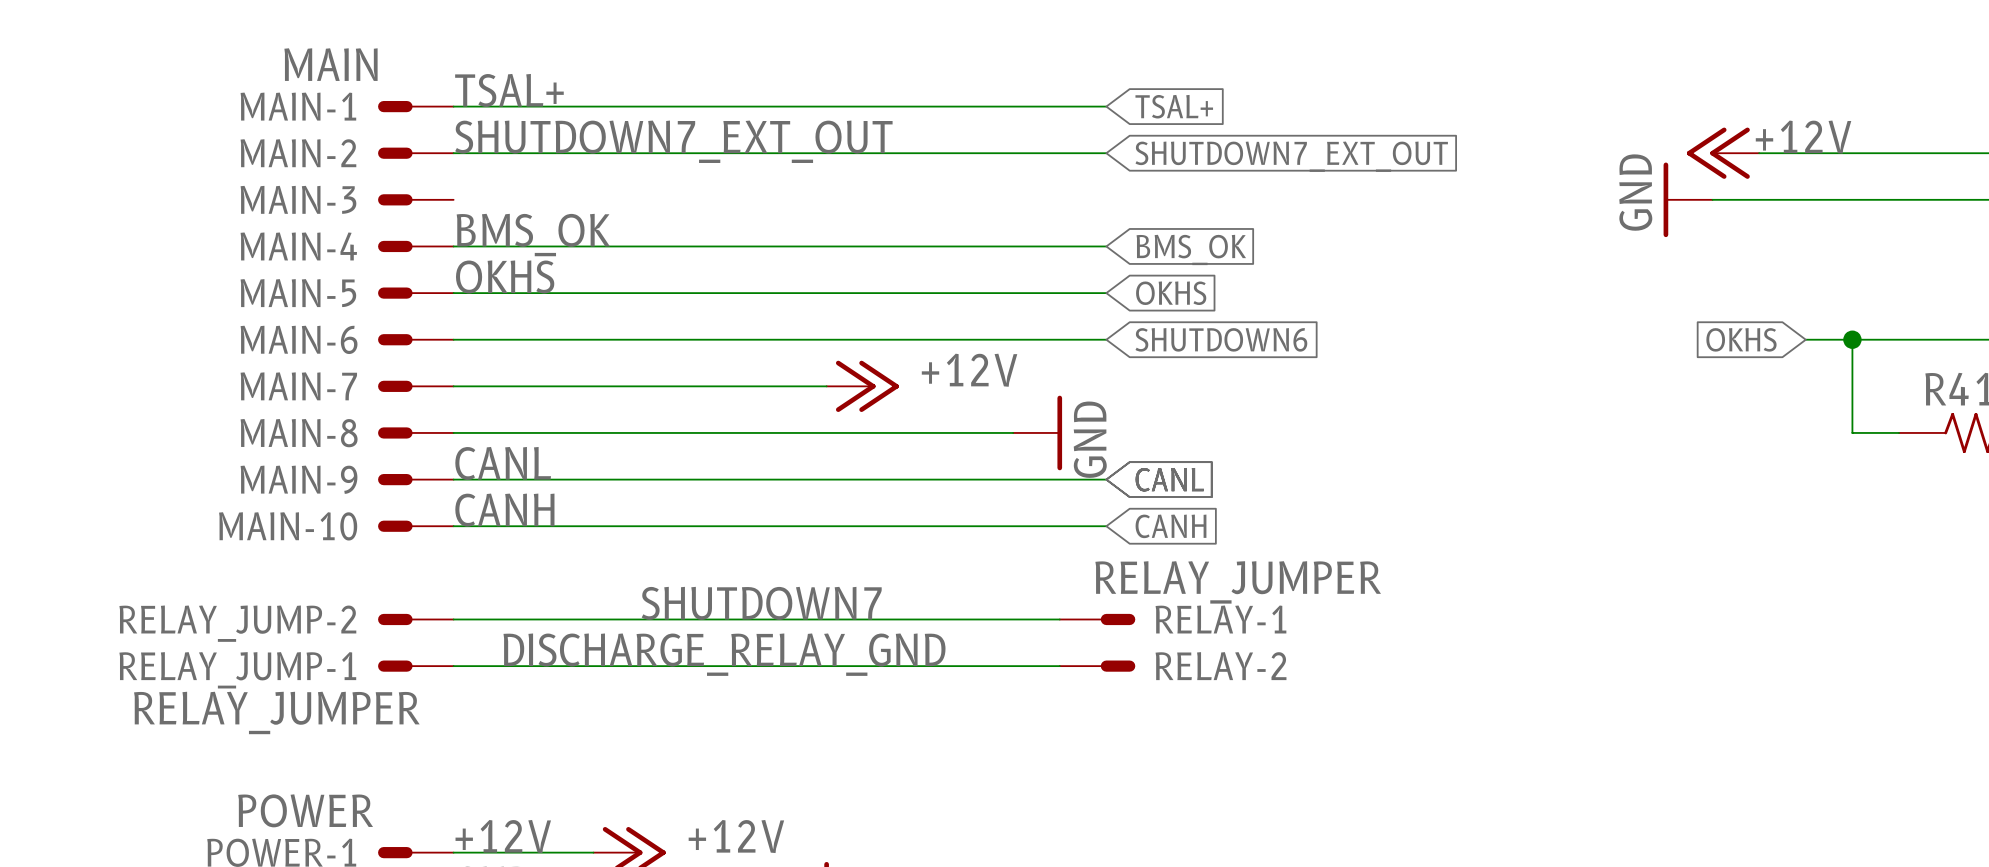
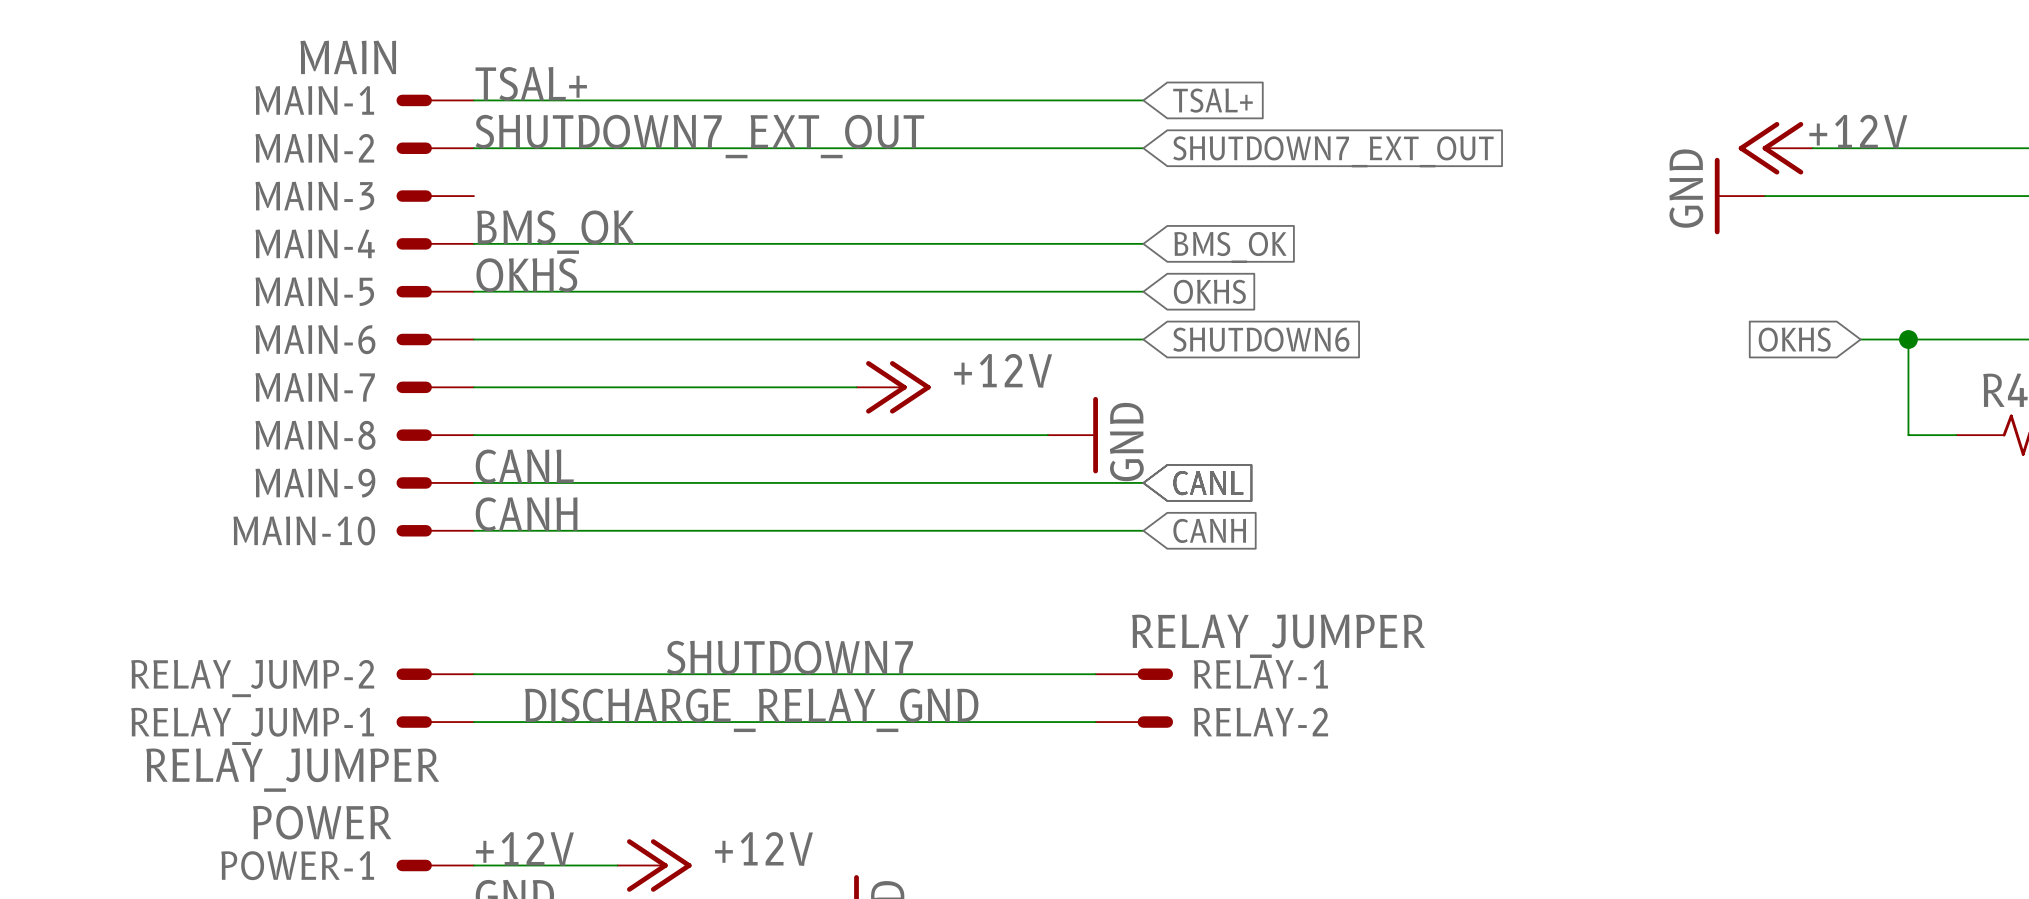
label position: SHUTDOWN7 (761, 603) -> SHUTDOWN7 (789, 657)
RELAY_JUMP-2: (415, 619) -> none
wire: (453, 619) (1059, 619) -> (473, 722) (1095, 722)
RELAY-1: RELAY_JUMPER (1097, 619) -> none
RELAY-2 value: none -> RELAY_JUMPER (1278, 636)
label position: DISCHARGE_RELAY_GND (724, 654) -> DISCHARGE_RELAY_GND (751, 710)
RELAY-2 name: RELAY-2 (1221, 666) -> RELAY-1 (1260, 674)
RELAY_JUMP-1 name: RELAY_JUMP-1 (237, 670) -> RELAY_JUMP-2 (252, 678)
RELAY_JUMP-1 value: RELAY_JUMPER (276, 712) -> none
RELAY_JUMP-1: none -> RELAY_JUMPER (435, 722)
RELAY-2: none -> (1134, 722)

